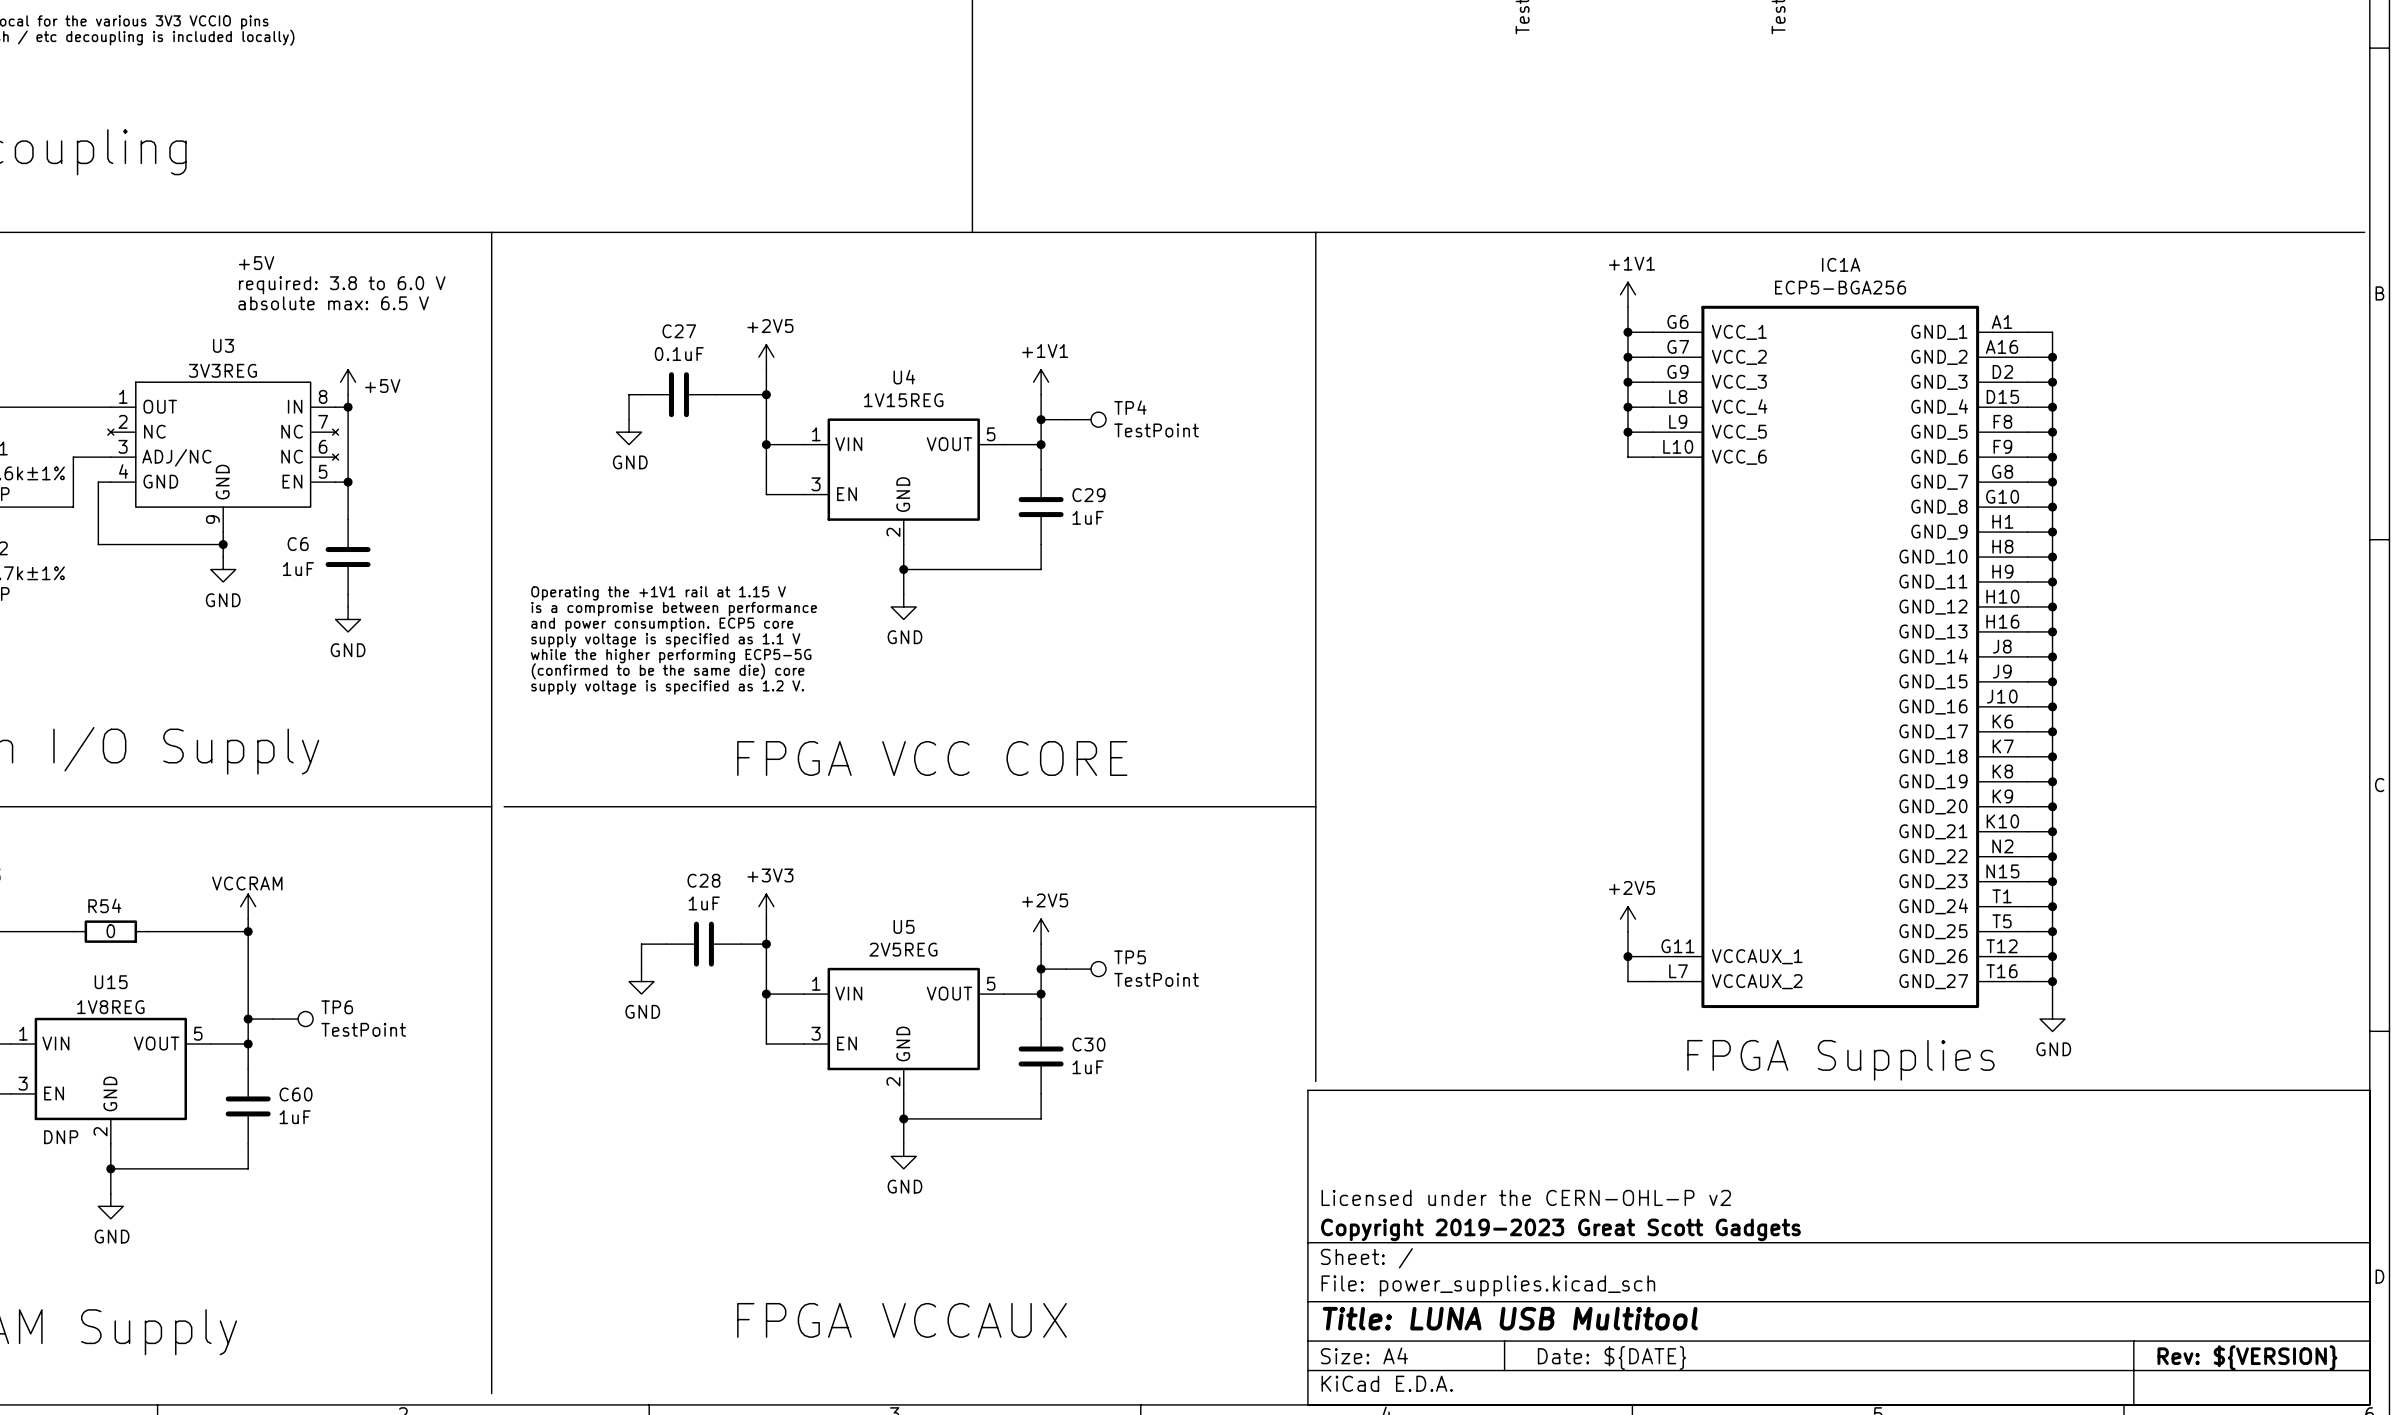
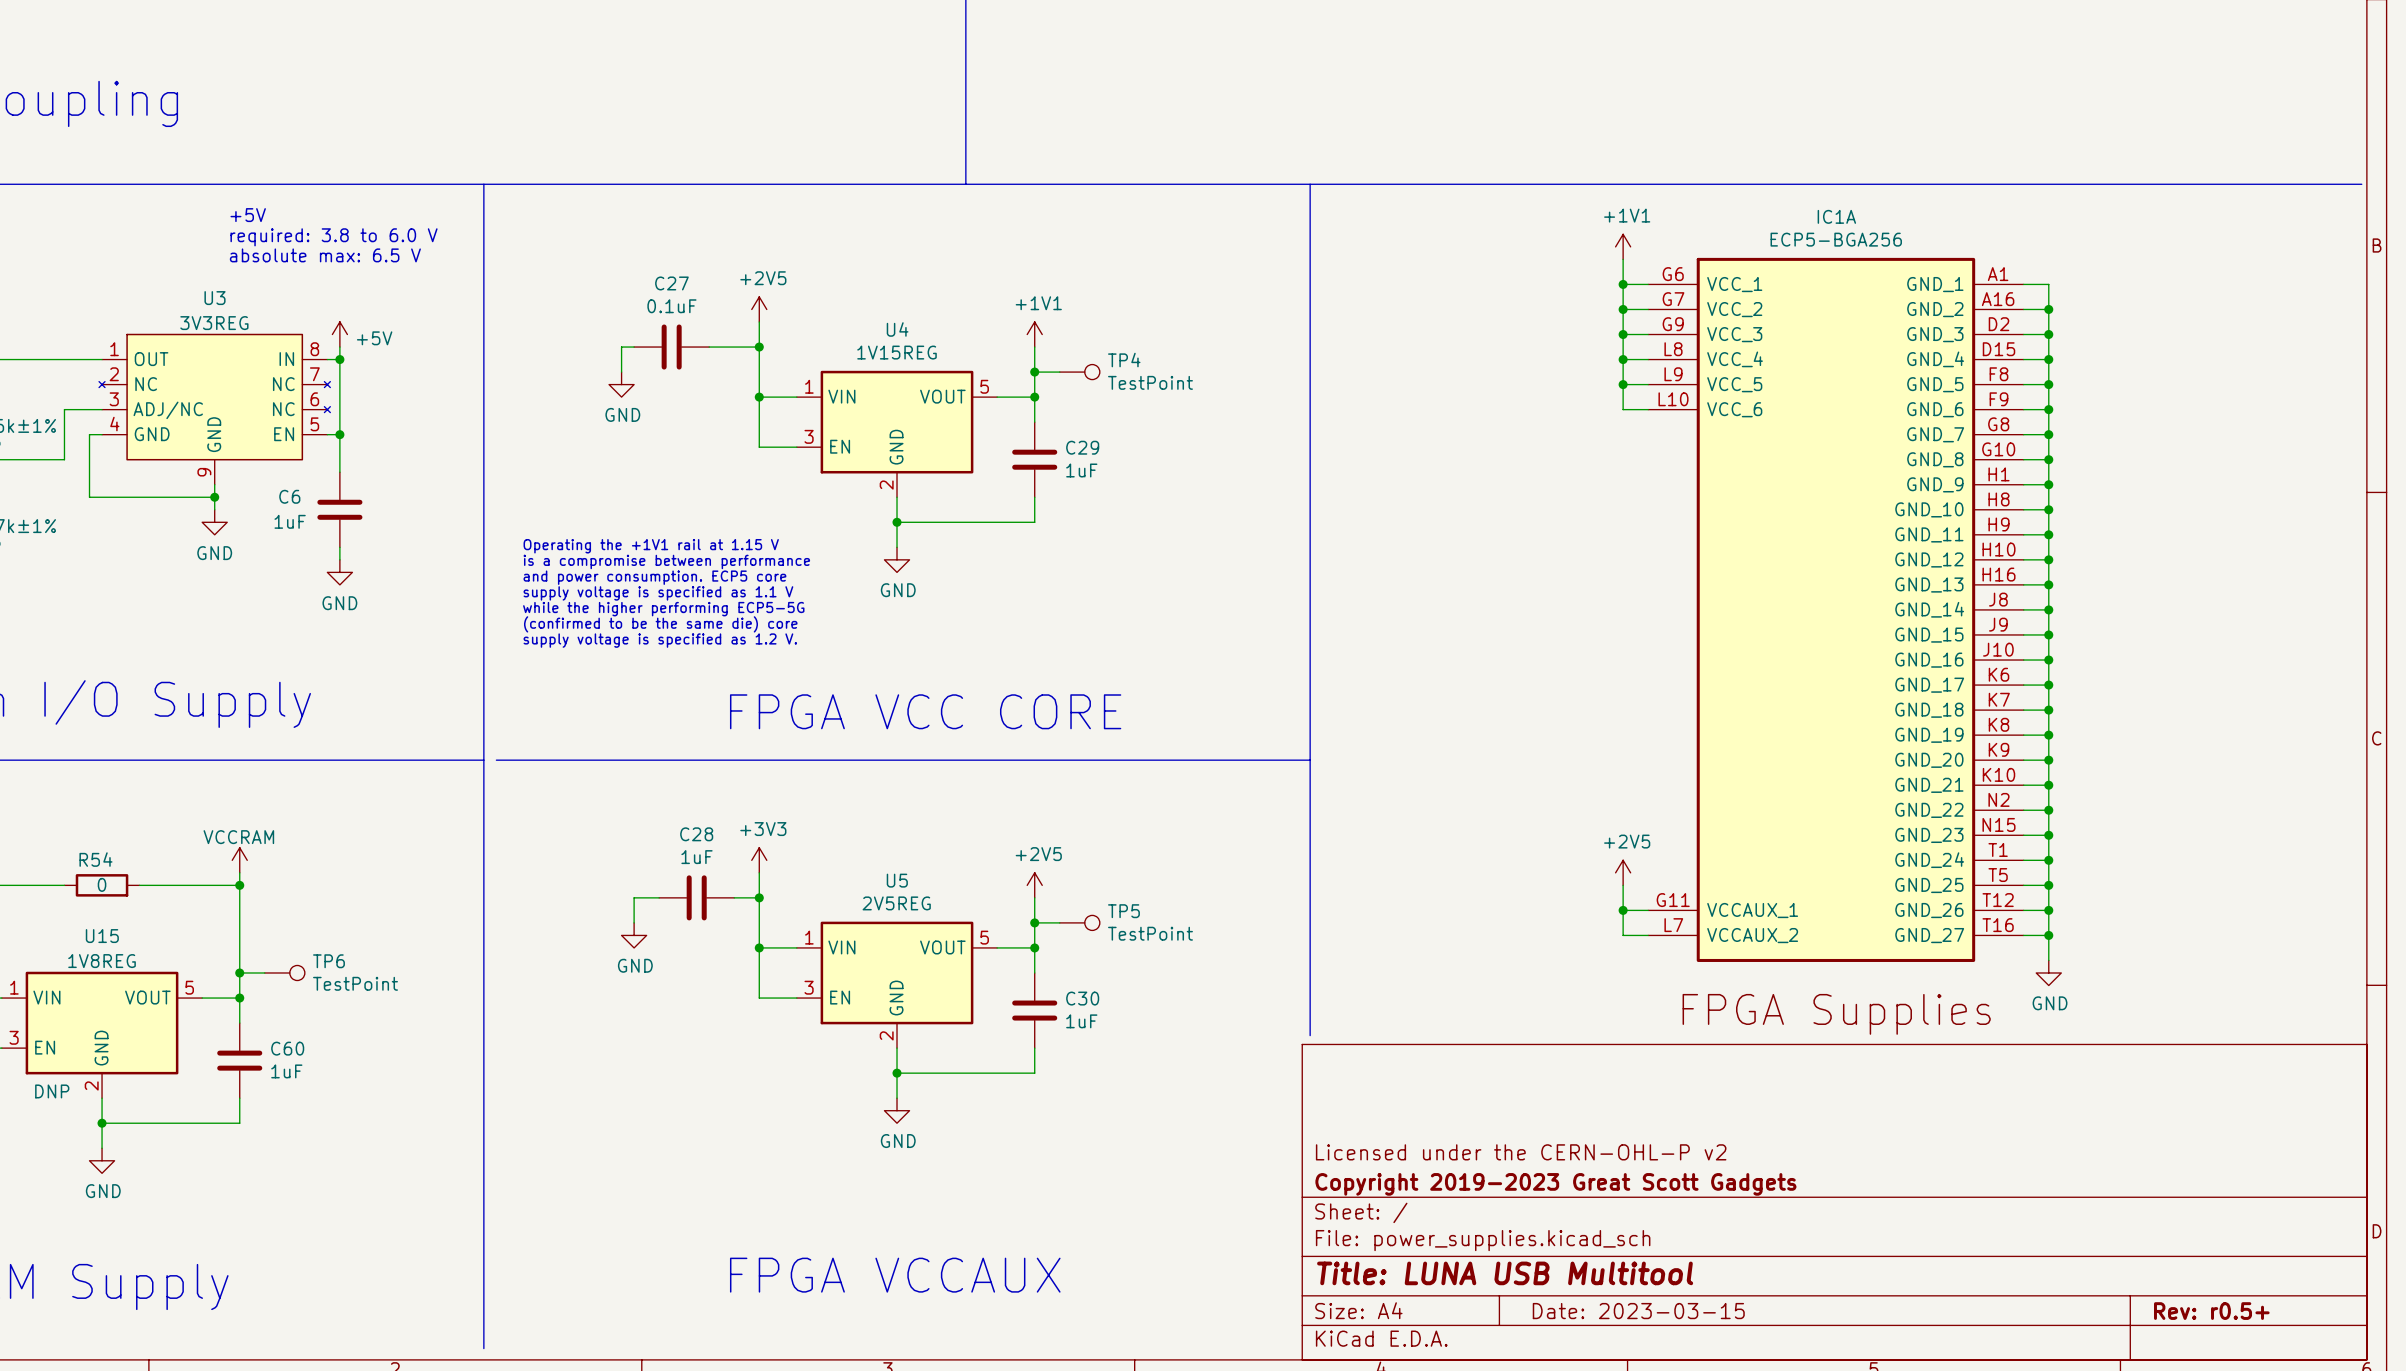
title block: Date: ${DATE} (1611, 1357) -> Date: 2023-03-15 (1638, 1311)
title block: Rev: ${VERSION} (2247, 1357) -> Rev: r0.5+ (2211, 1311)

